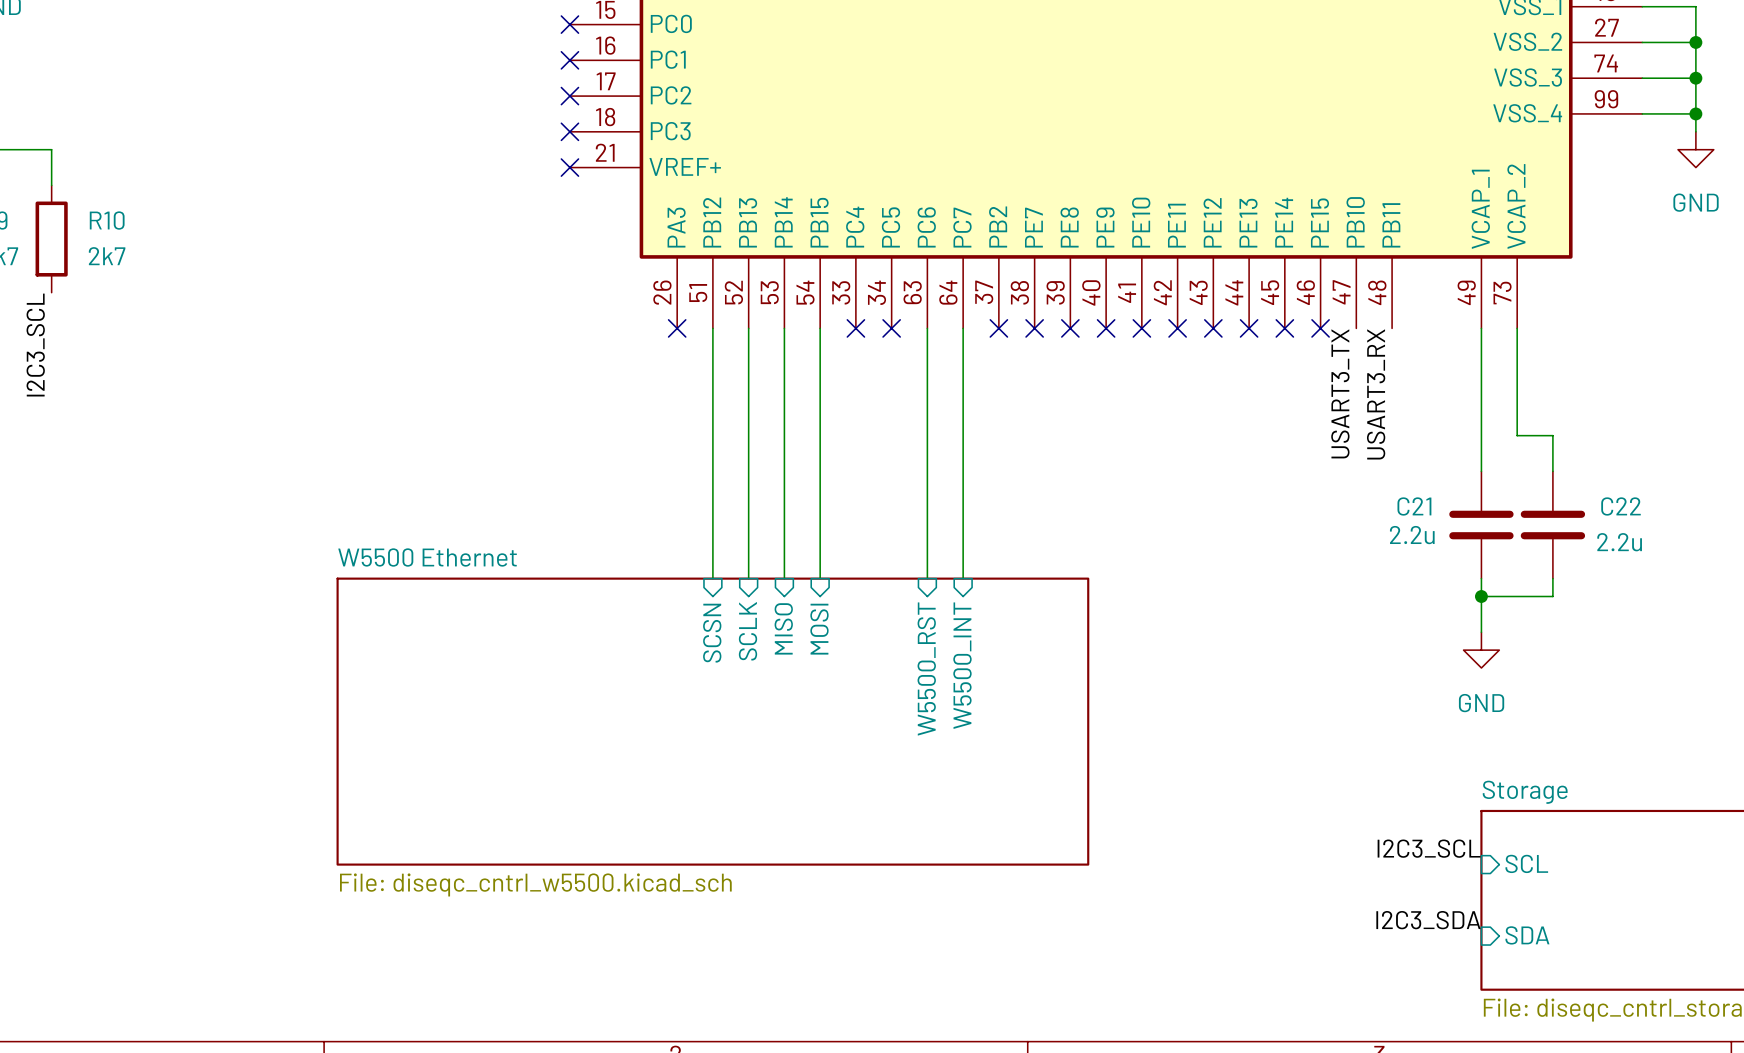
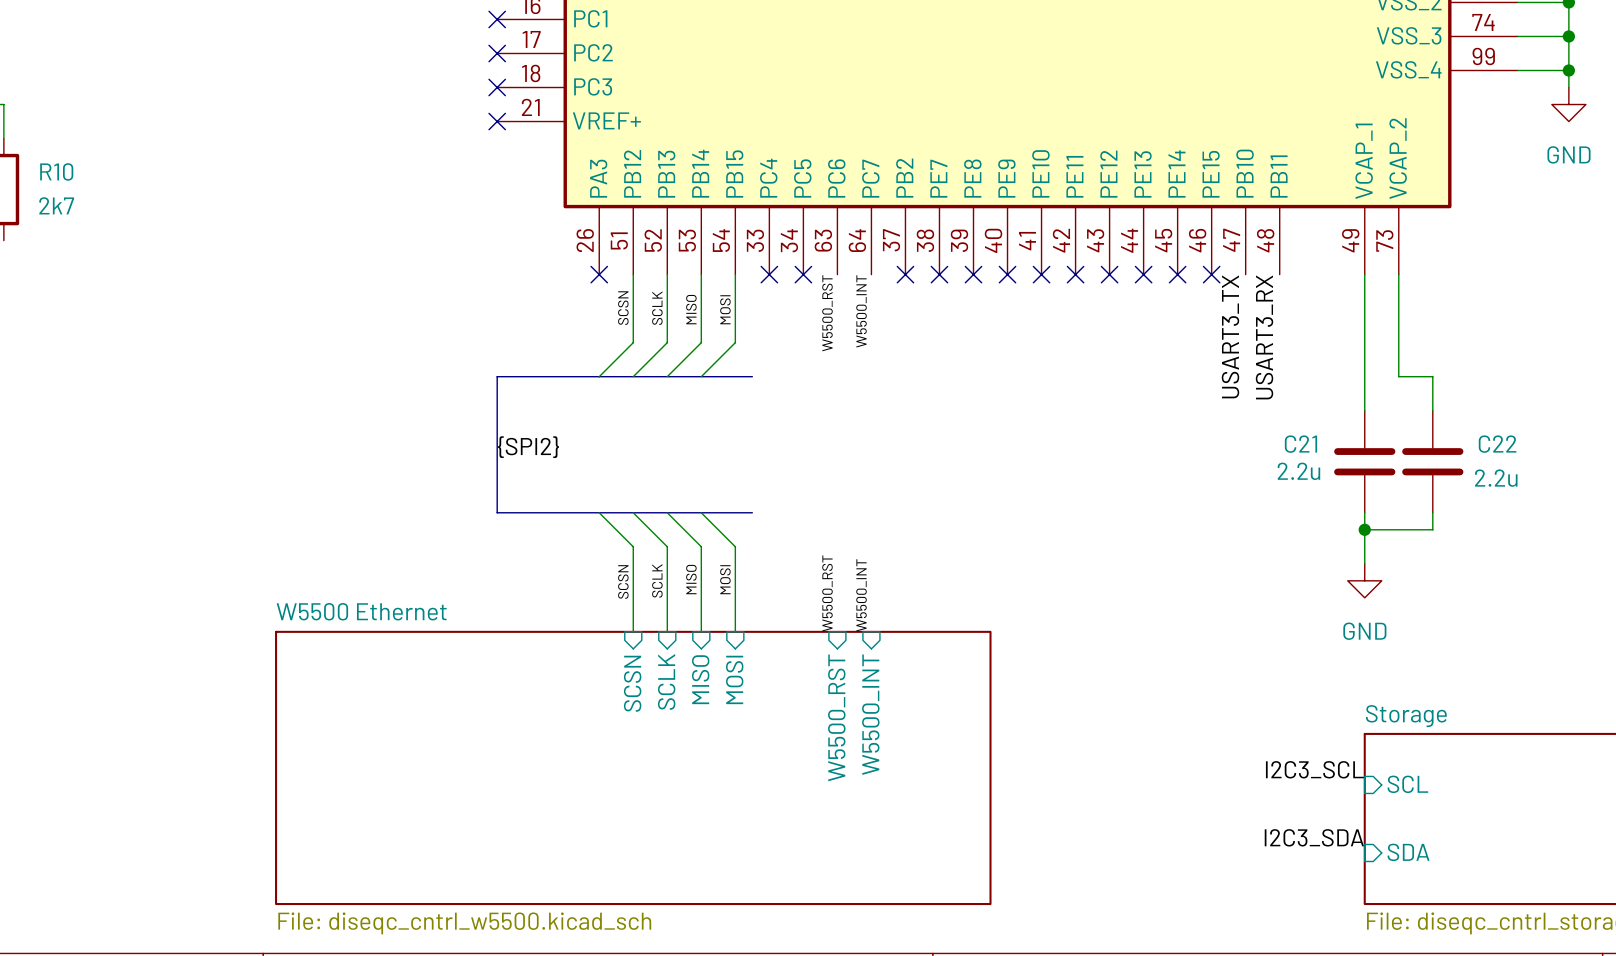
wire: (927, 328) (927, 578) -> none
wire: (963, 328) (963, 578) -> none
label: none -> SCSN (623, 308)
label: none -> SCLK (657, 308)
label: none -> MISO (691, 309)
label: none -> MOSI (725, 309)
label: none -> W5500_INT (861, 311)
label: none -> W5500_RST (827, 313)
wire: (712, 399) (712, 578) -> (633, 342) (599, 376)
wire: (748, 399) (748, 578) -> (667, 342) (633, 376)
wire: (784, 399) (784, 578) -> (701, 342) (667, 376)
wire: (820, 399) (820, 578) -> (735, 342) (701, 376)
bus: none -> (752, 376) (497, 376) (497, 512) (752, 512)
label: none -> {SPI2} (528, 447)
wire: none -> (599, 512) (633, 546) (633, 631)
wire: none -> (633, 512) (667, 546) (667, 631)
wire: none -> (667, 512) (701, 546) (701, 631)
wire: none -> (701, 512) (735, 546) (735, 631)
sheet pin position: MISO (783, 628) -> MISO (700, 679)
sheet pin position: MOSI (819, 629) -> MOSI (734, 679)
sheet pin position: SCLK (748, 631) -> SCLK (666, 681)
sheet pin position: SCSN (712, 633) -> SCSN (632, 683)
label: none -> MISO (691, 579)
label: none -> MOSI (725, 579)
label: none -> SCLK (657, 580)
label: none -> SCSN (623, 581)
label: none -> W5500_RST (827, 593)
label: none -> W5500_INT (861, 595)
sheet pin position: W5500_INT (962, 665) -> W5500_INT (870, 714)
sheet pin position: W5500_RST (926, 669) -> W5500_RST (836, 717)
sheet W5500 Ethernet position: (712, 721) -> (633, 767)

